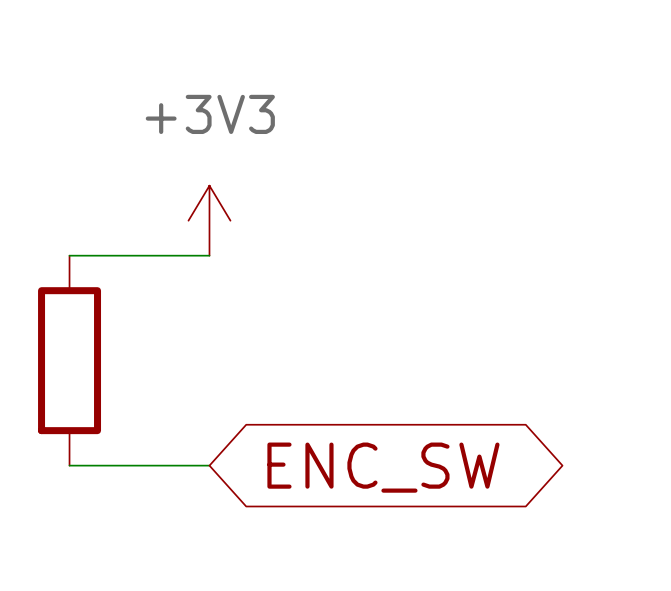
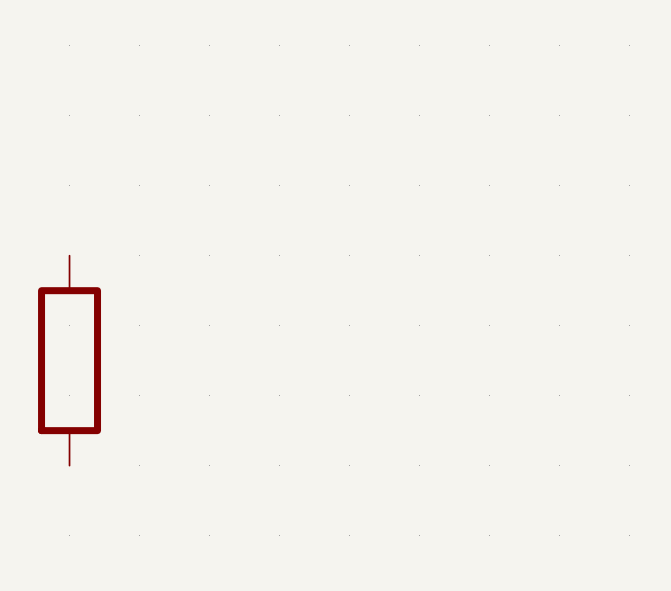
power symbol: +3V3 (209, 220) -> none
wire: (69, 255) (209, 255) -> none
wire: (69, 465) (209, 465) -> none
global label: ENC_SW (383, 467) -> none

